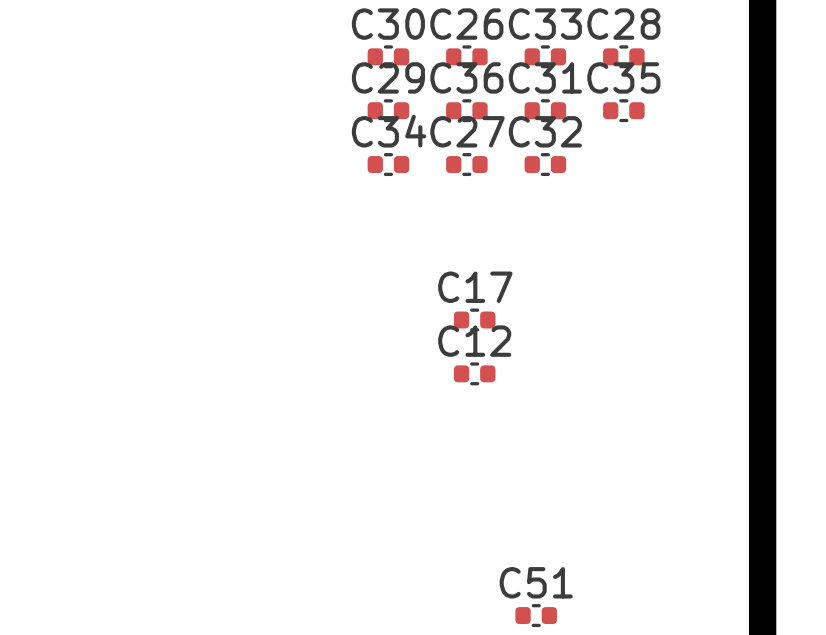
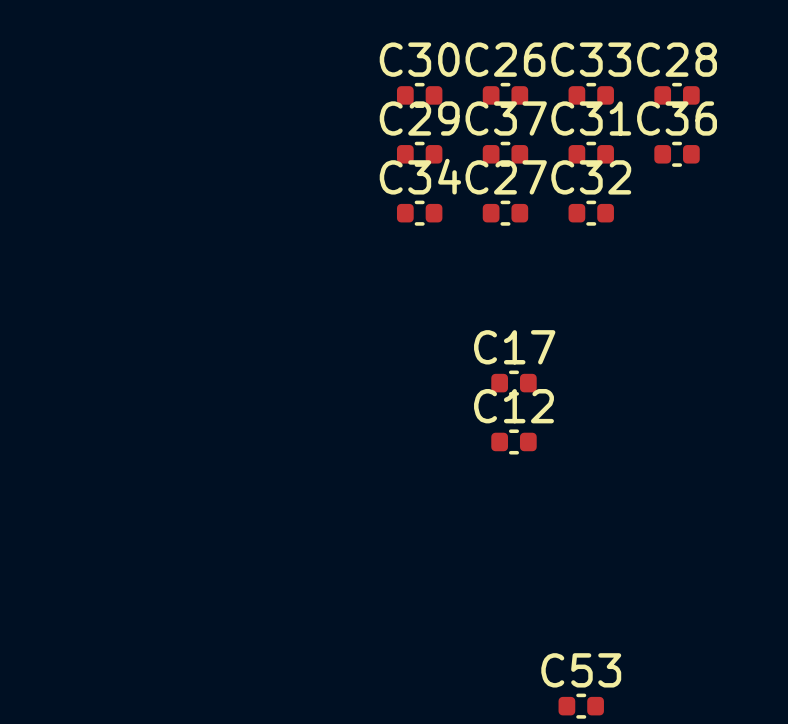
C36 name: C36 (466, 77) -> C37 (506, 118)
C35 name: C35 (623, 77) -> C36 (677, 118)
C51 name: C51 (536, 582) -> C53 (581, 670)

